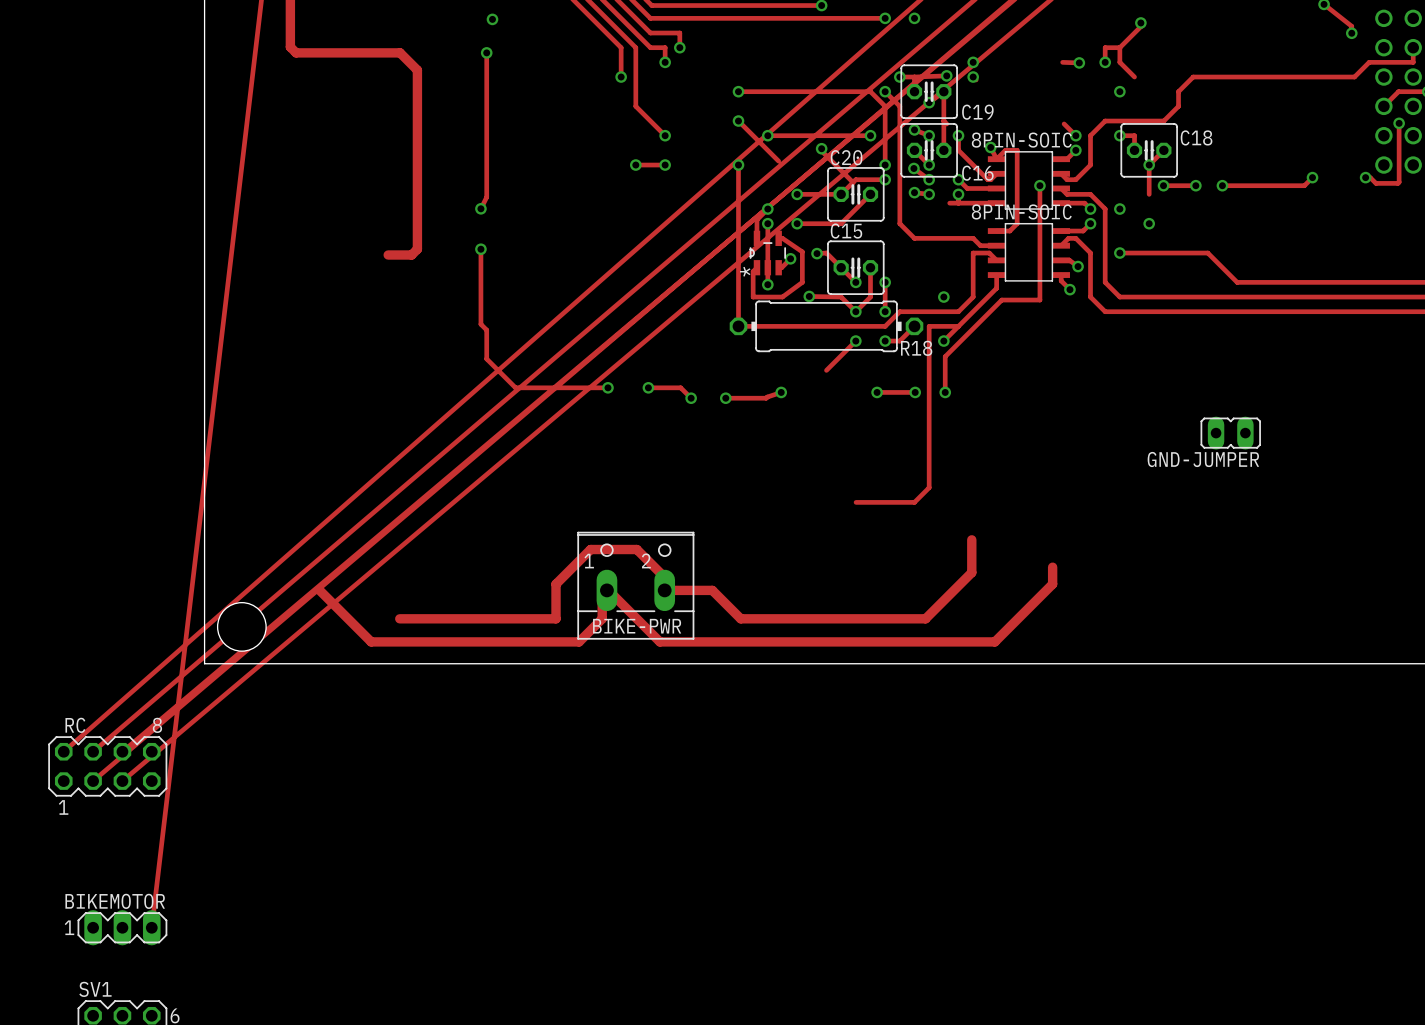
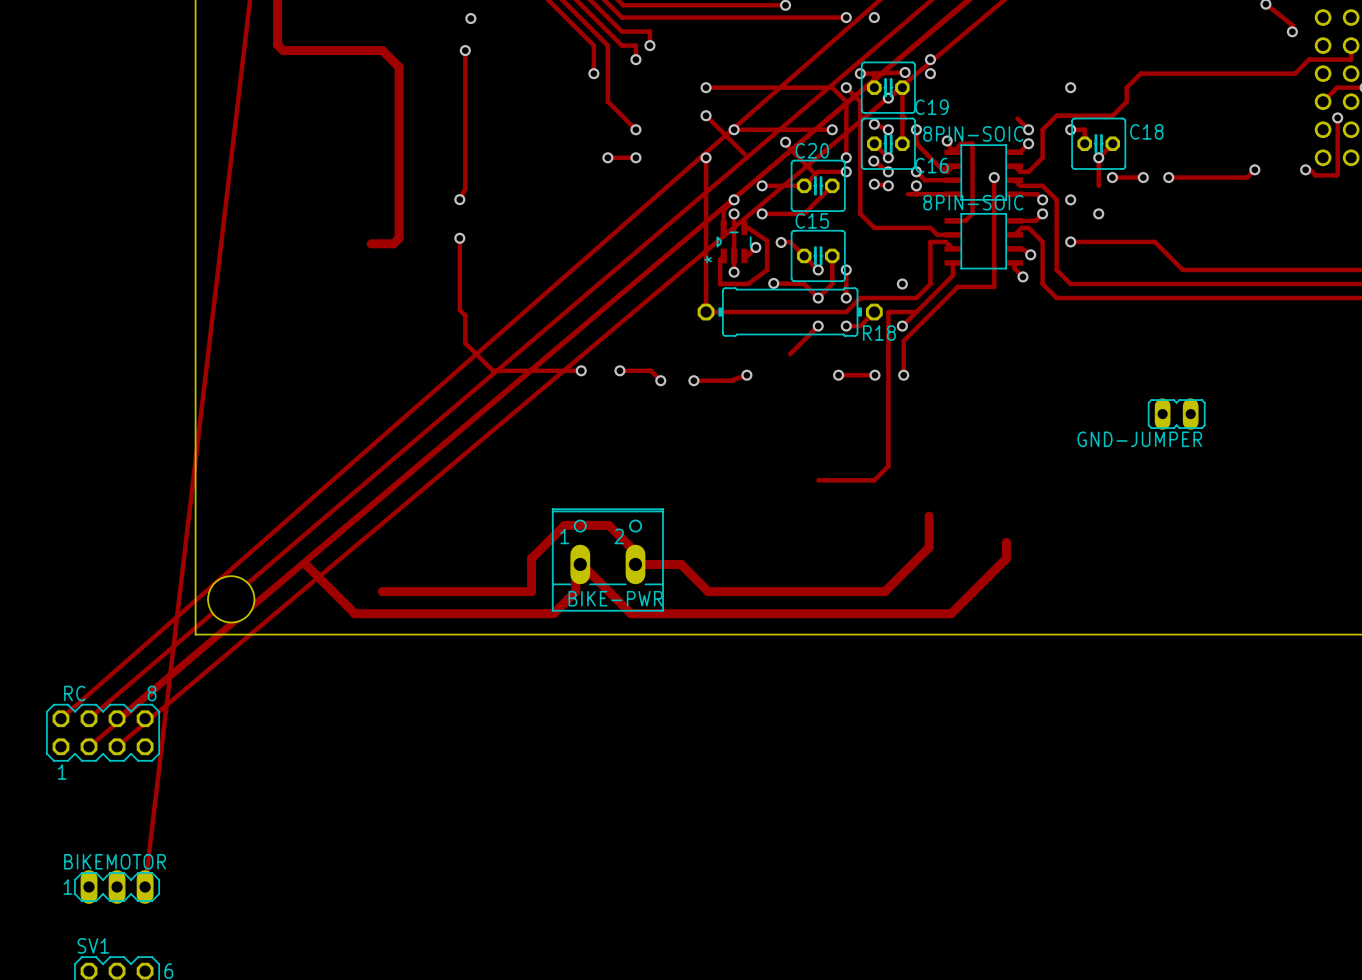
track: (1140, 22) (1140, 26) (1119, 47) -> none
via: (1140, 22) -> none
track: (1119, 47) (1119, 62) (1134, 77) -> none
track: (1119, 47) (1105, 47) (1105, 62) -> none
track: (1062, 62) (1079, 62) -> none
via: (1079, 62) -> none
via: (1105, 62) -> none

